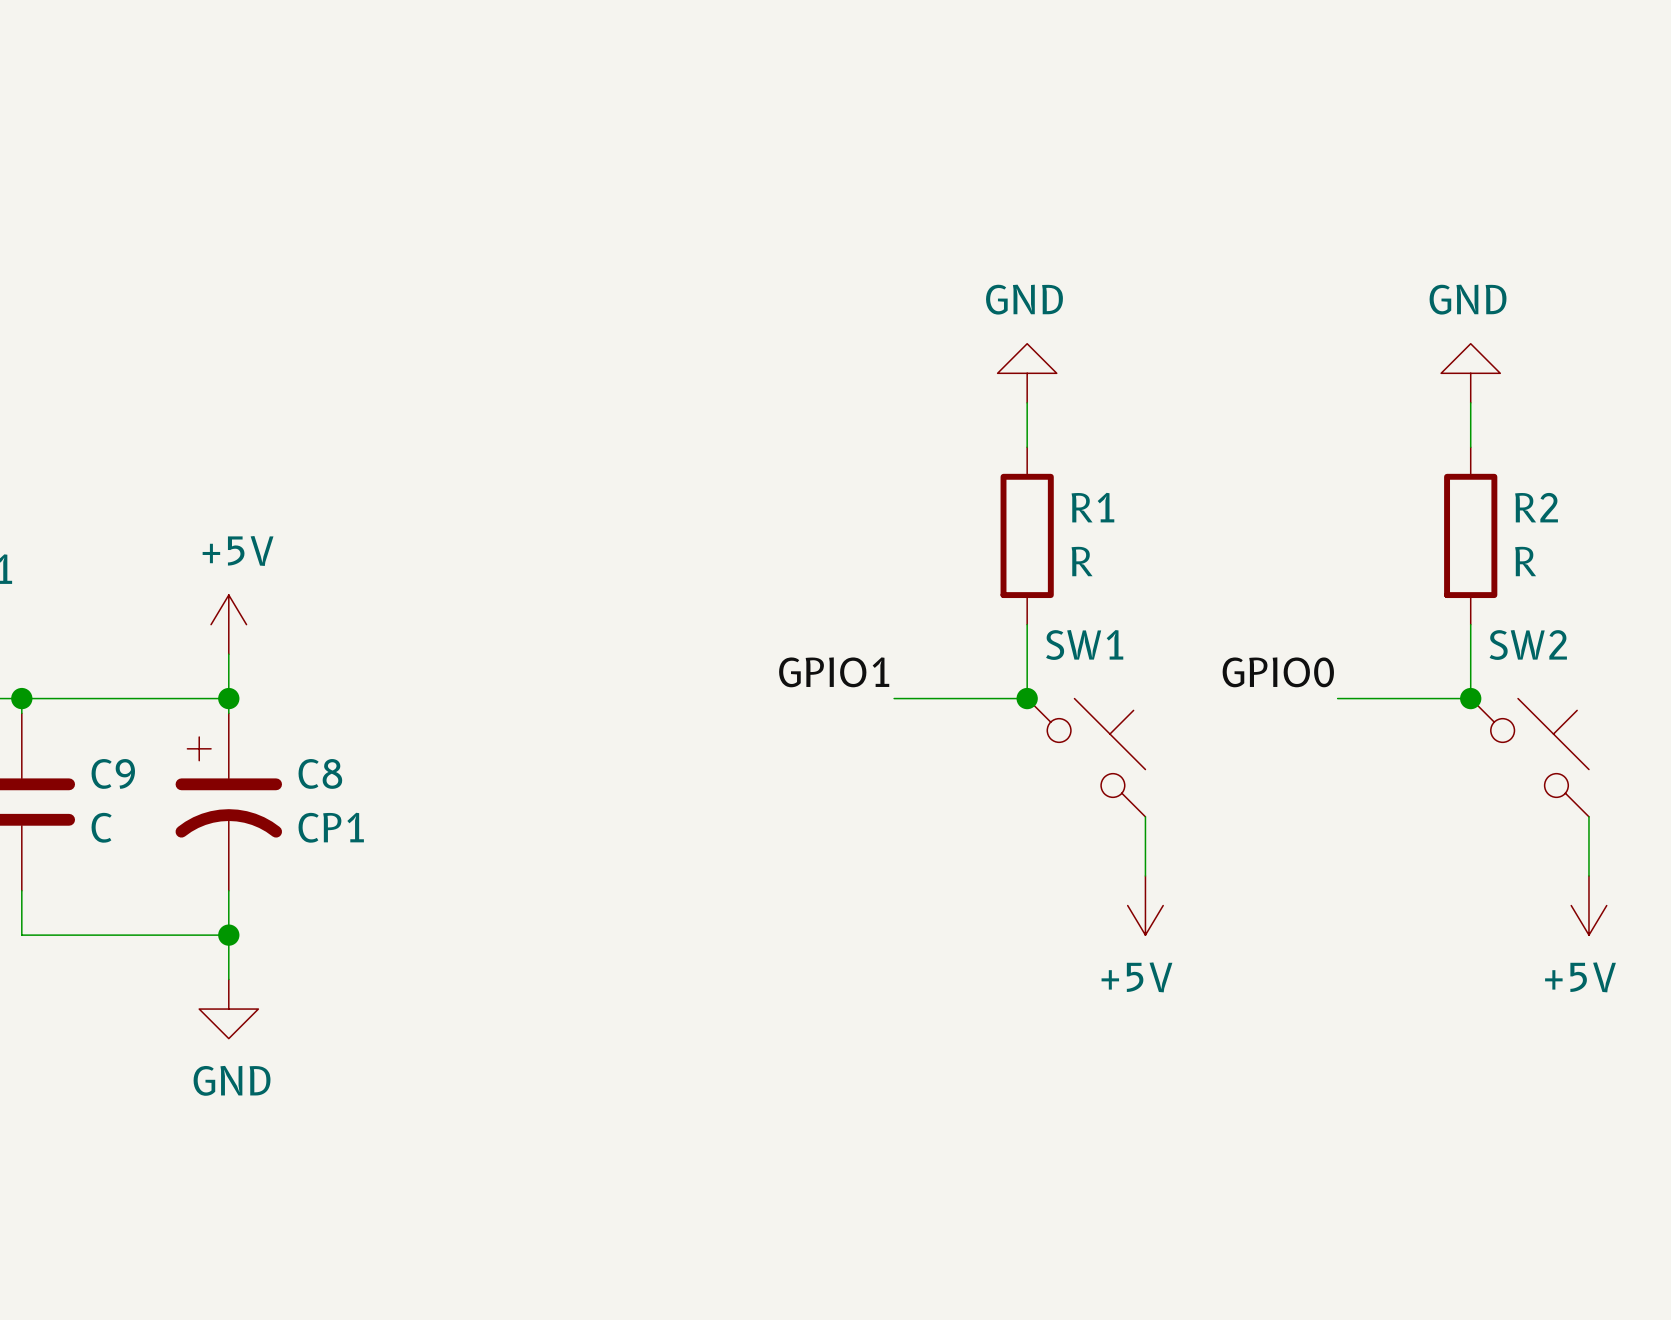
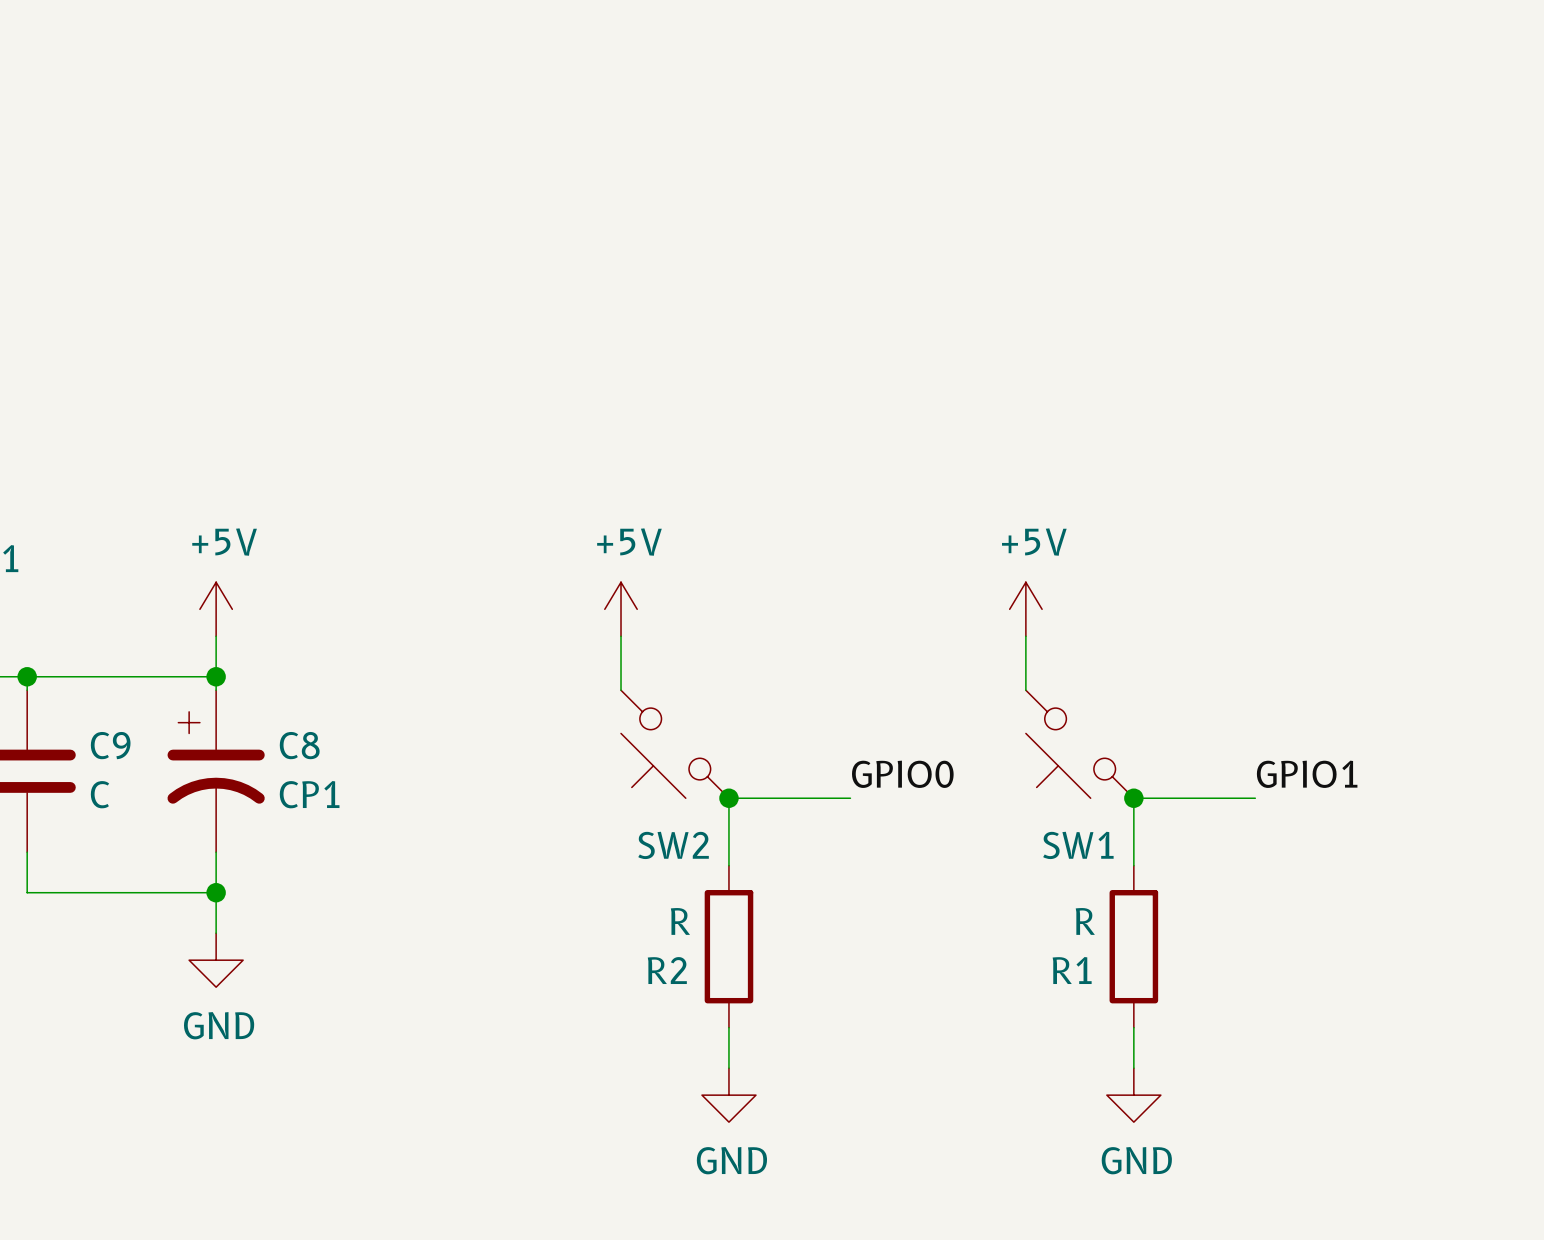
power symbol: GND (1027, 373) -> none
power symbol: GND (1470, 373) -> none
wire: (1027, 402) (1027, 447) -> none
wire: (1470, 402) (1470, 447) -> none
R1 name position: R1 (1092, 507) -> R1 (1072, 970)
R2 name position: R2 (1536, 507) -> R2 (667, 970)
R1 position: (1027, 535) -> (1133, 946)
R2 position: (1470, 535) -> (728, 946)
R1 value position: R (1082, 561) -> R (1085, 921)
R2 value position: R (1525, 561) -> R (680, 921)
power symbol: none -> +5V (621, 609)
wire: (1027, 624) (1027, 698) (894, 698) -> none
power symbol: none -> +5V (1025, 609)
wire: (1470, 624) (1470, 698) (1337, 698) -> none
label position: GPIO1 (834, 672) -> GPIO1 (1307, 774)
label position: GPIO0 (1278, 672) -> GPIO0 (902, 774)
junction: (1027, 698) -> none
junction: (1470, 698) -> none
SW1 rotation: 0° (1086, 757) -> 180° (1079, 744)
SW1 position: (1086, 757) -> (1079, 744)
SW2 rotation: 0° (1529, 757) -> 180° (674, 744)
SW2 position: (1529, 757) -> (674, 744)
wire: (1145, 816) (1145, 875) -> (621, 636) (621, 690)
wire: (1588, 816) (1588, 875) -> (1025, 636) (1025, 690)
junction: none -> (728, 798)
wire: none -> (850, 798) (728, 798) (728, 865)
junction: none -> (1133, 798)
wire: none -> (1255, 798) (1133, 798) (1133, 865)
power symbol: +5V (1145, 905) -> none
power symbol: +5V (1588, 905) -> none
wire: none -> (728, 1027) (728, 1068)
wire: none -> (1133, 1027) (1133, 1068)
power symbol: none -> GND (728, 1095)
power symbol: none -> GND (1133, 1095)

